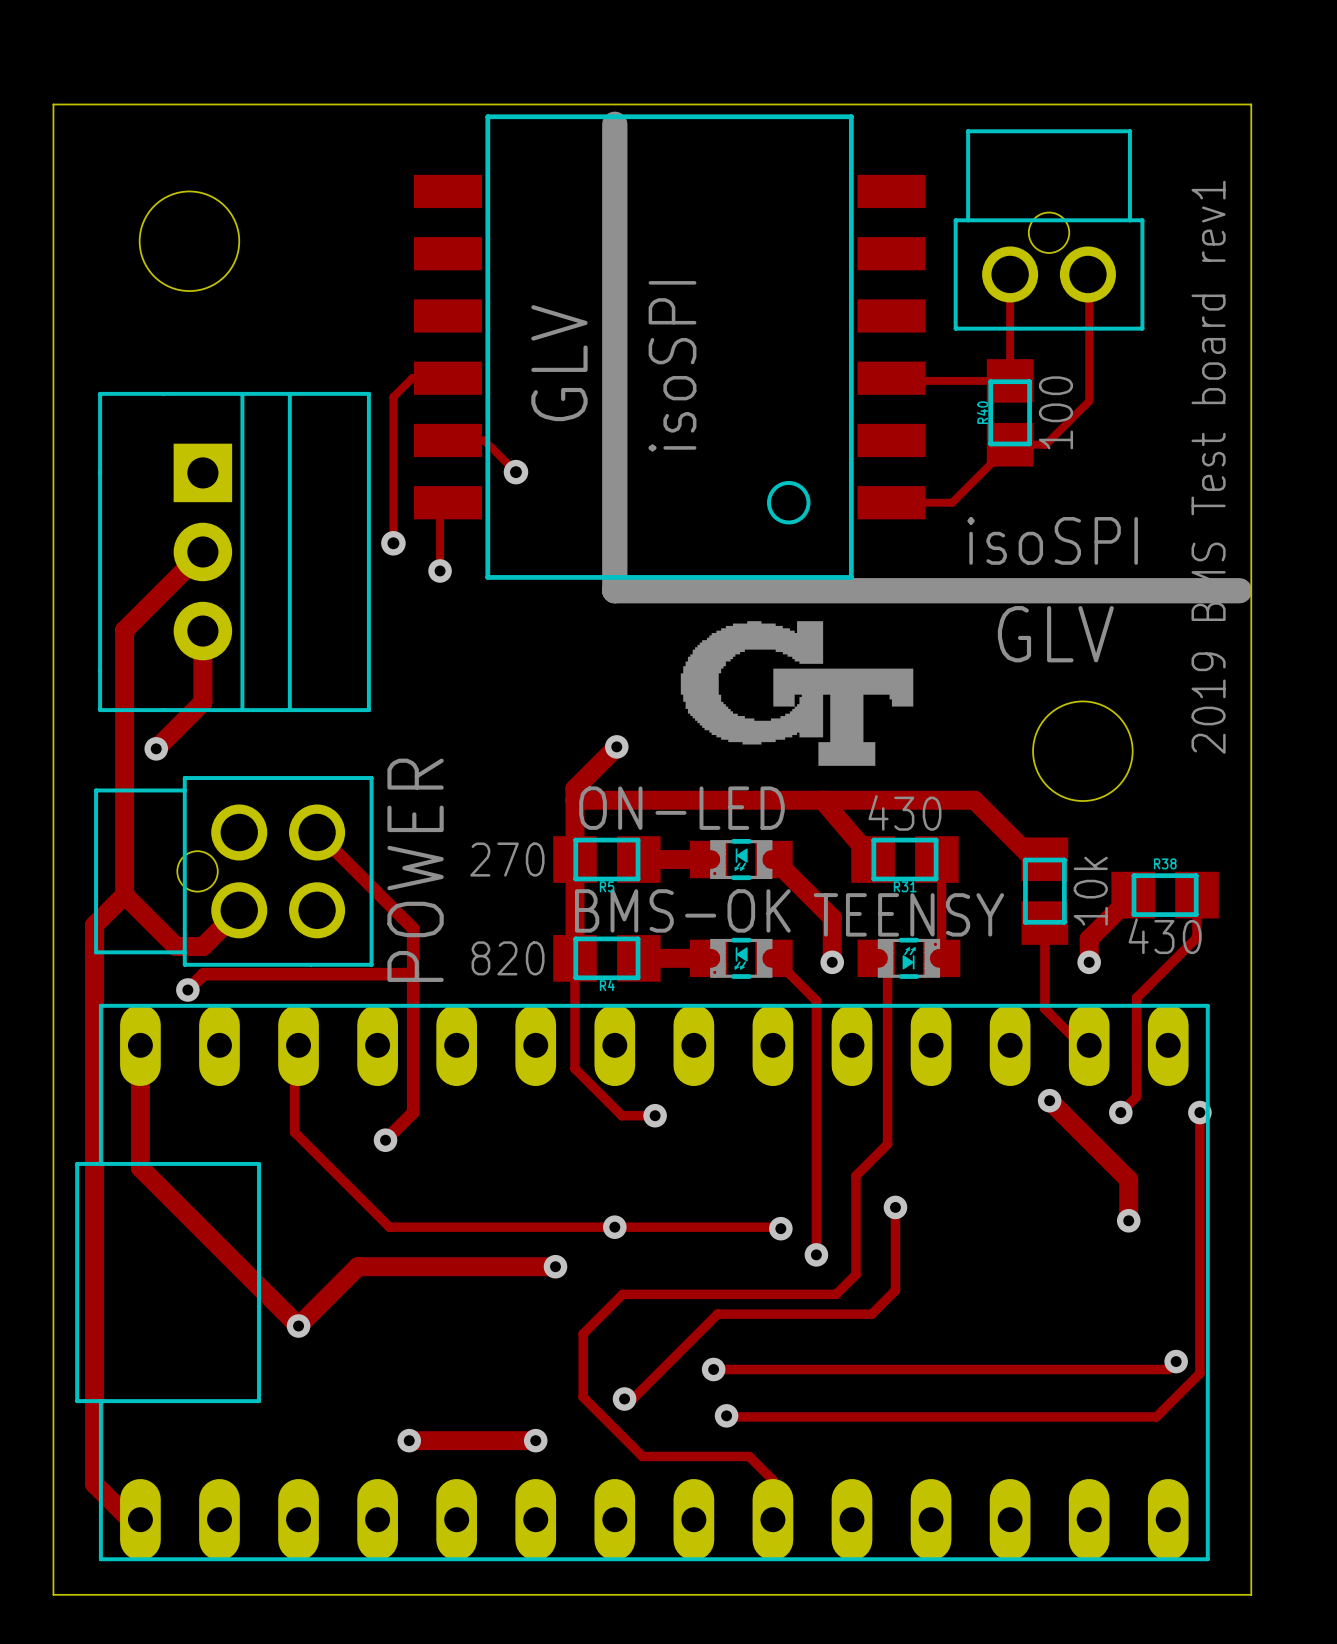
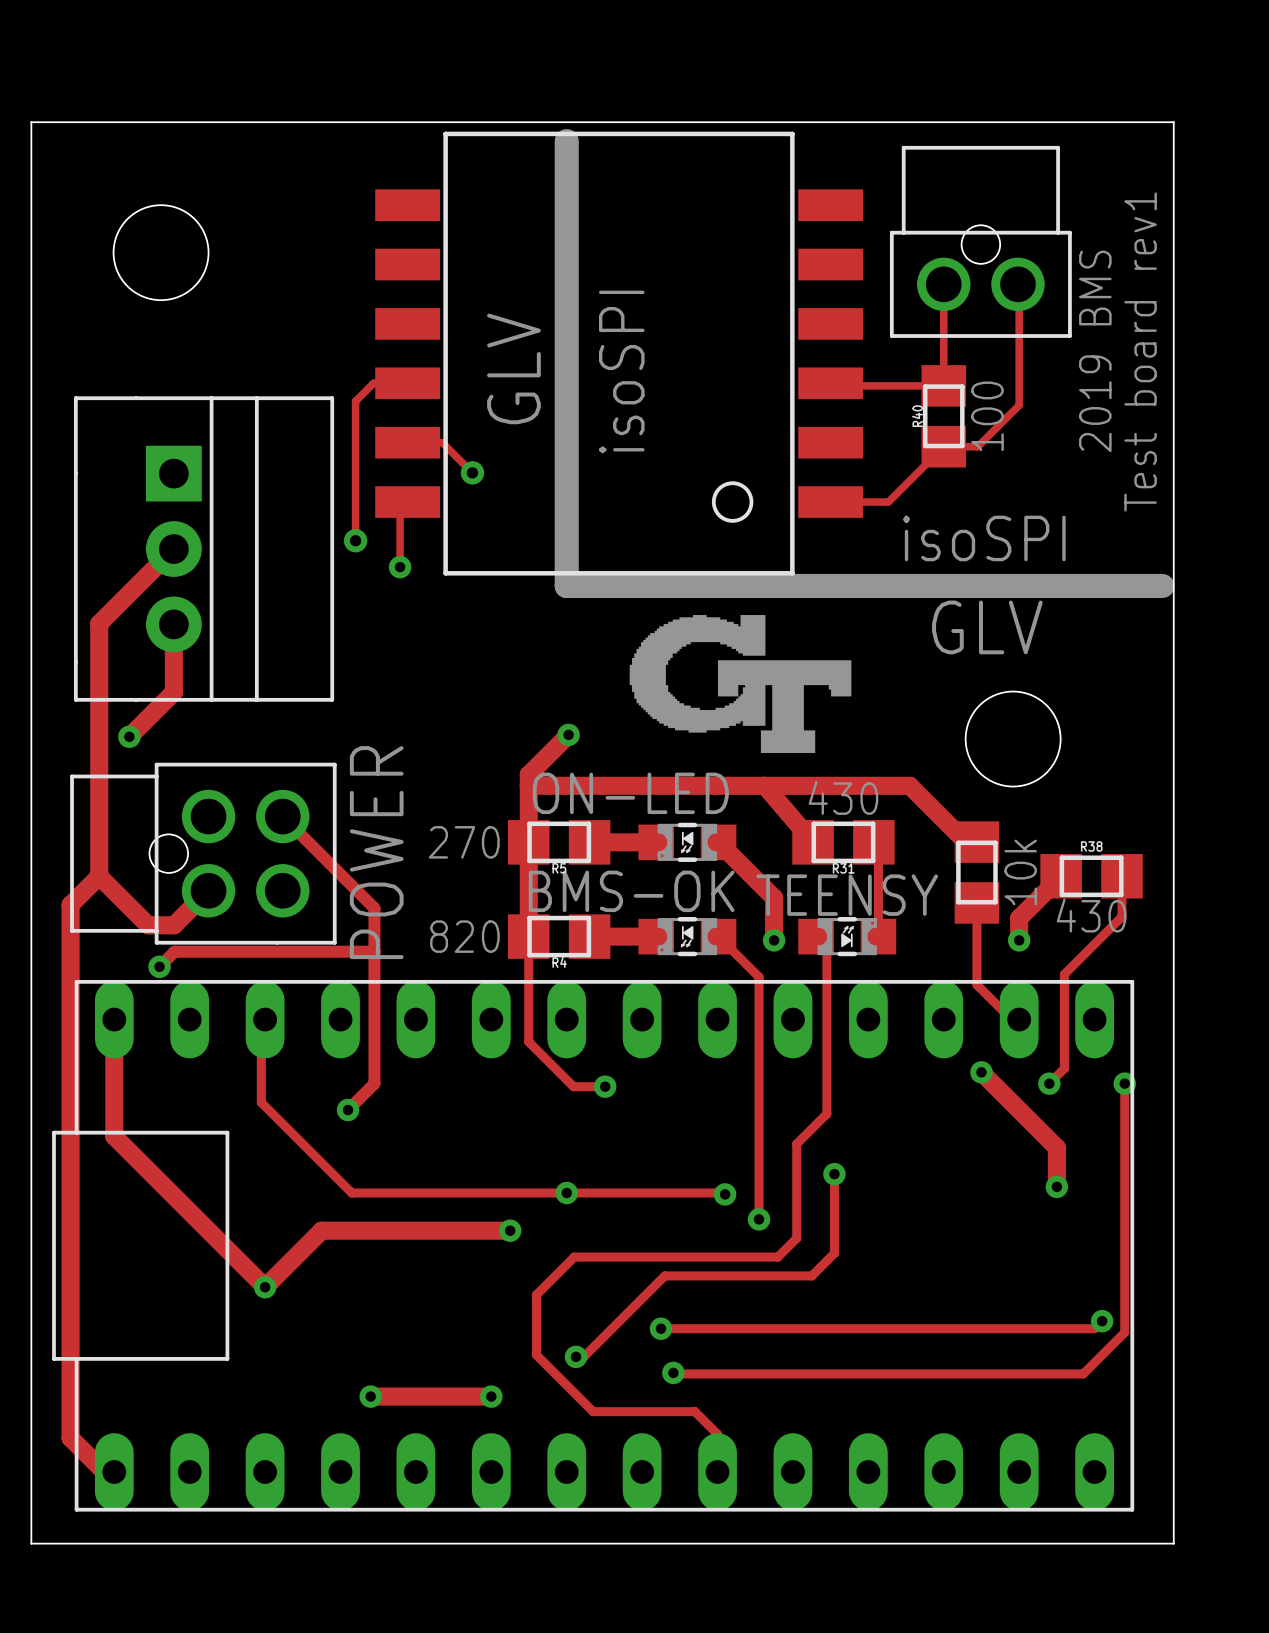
text: none -> 2019 BMS (1095, 351)
text: 2019 BMS Test board rev1 (1208, 467) -> Test board rev1 (1140, 352)

